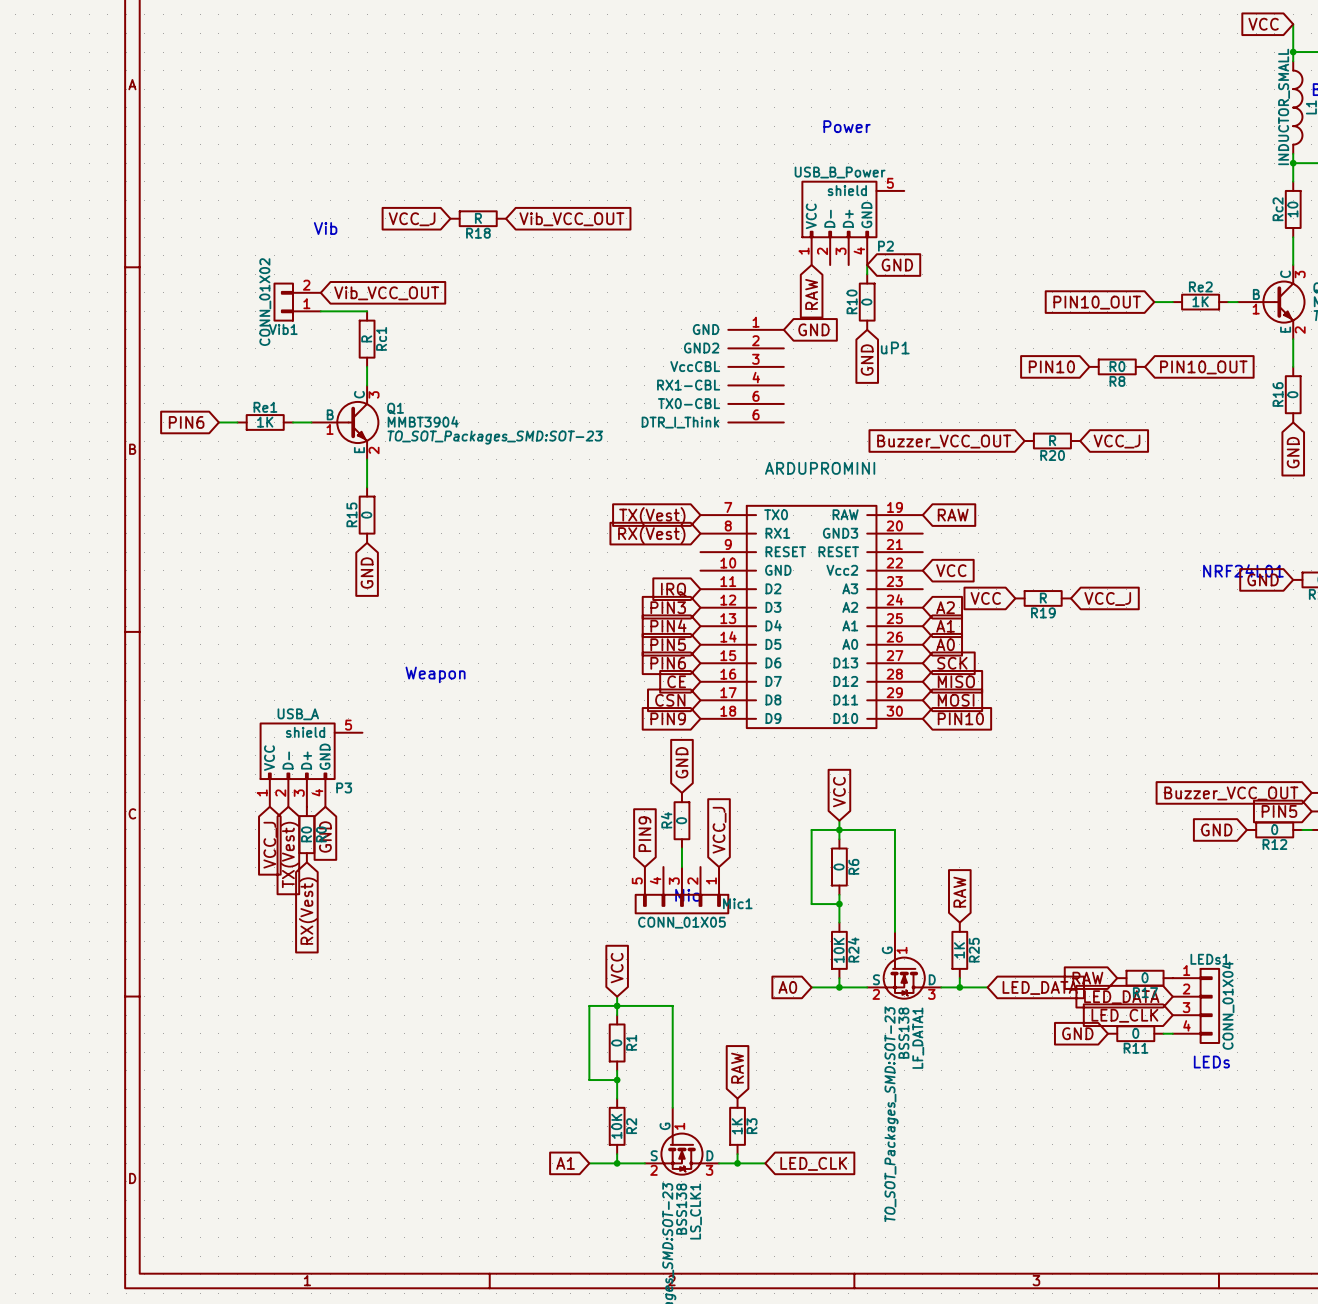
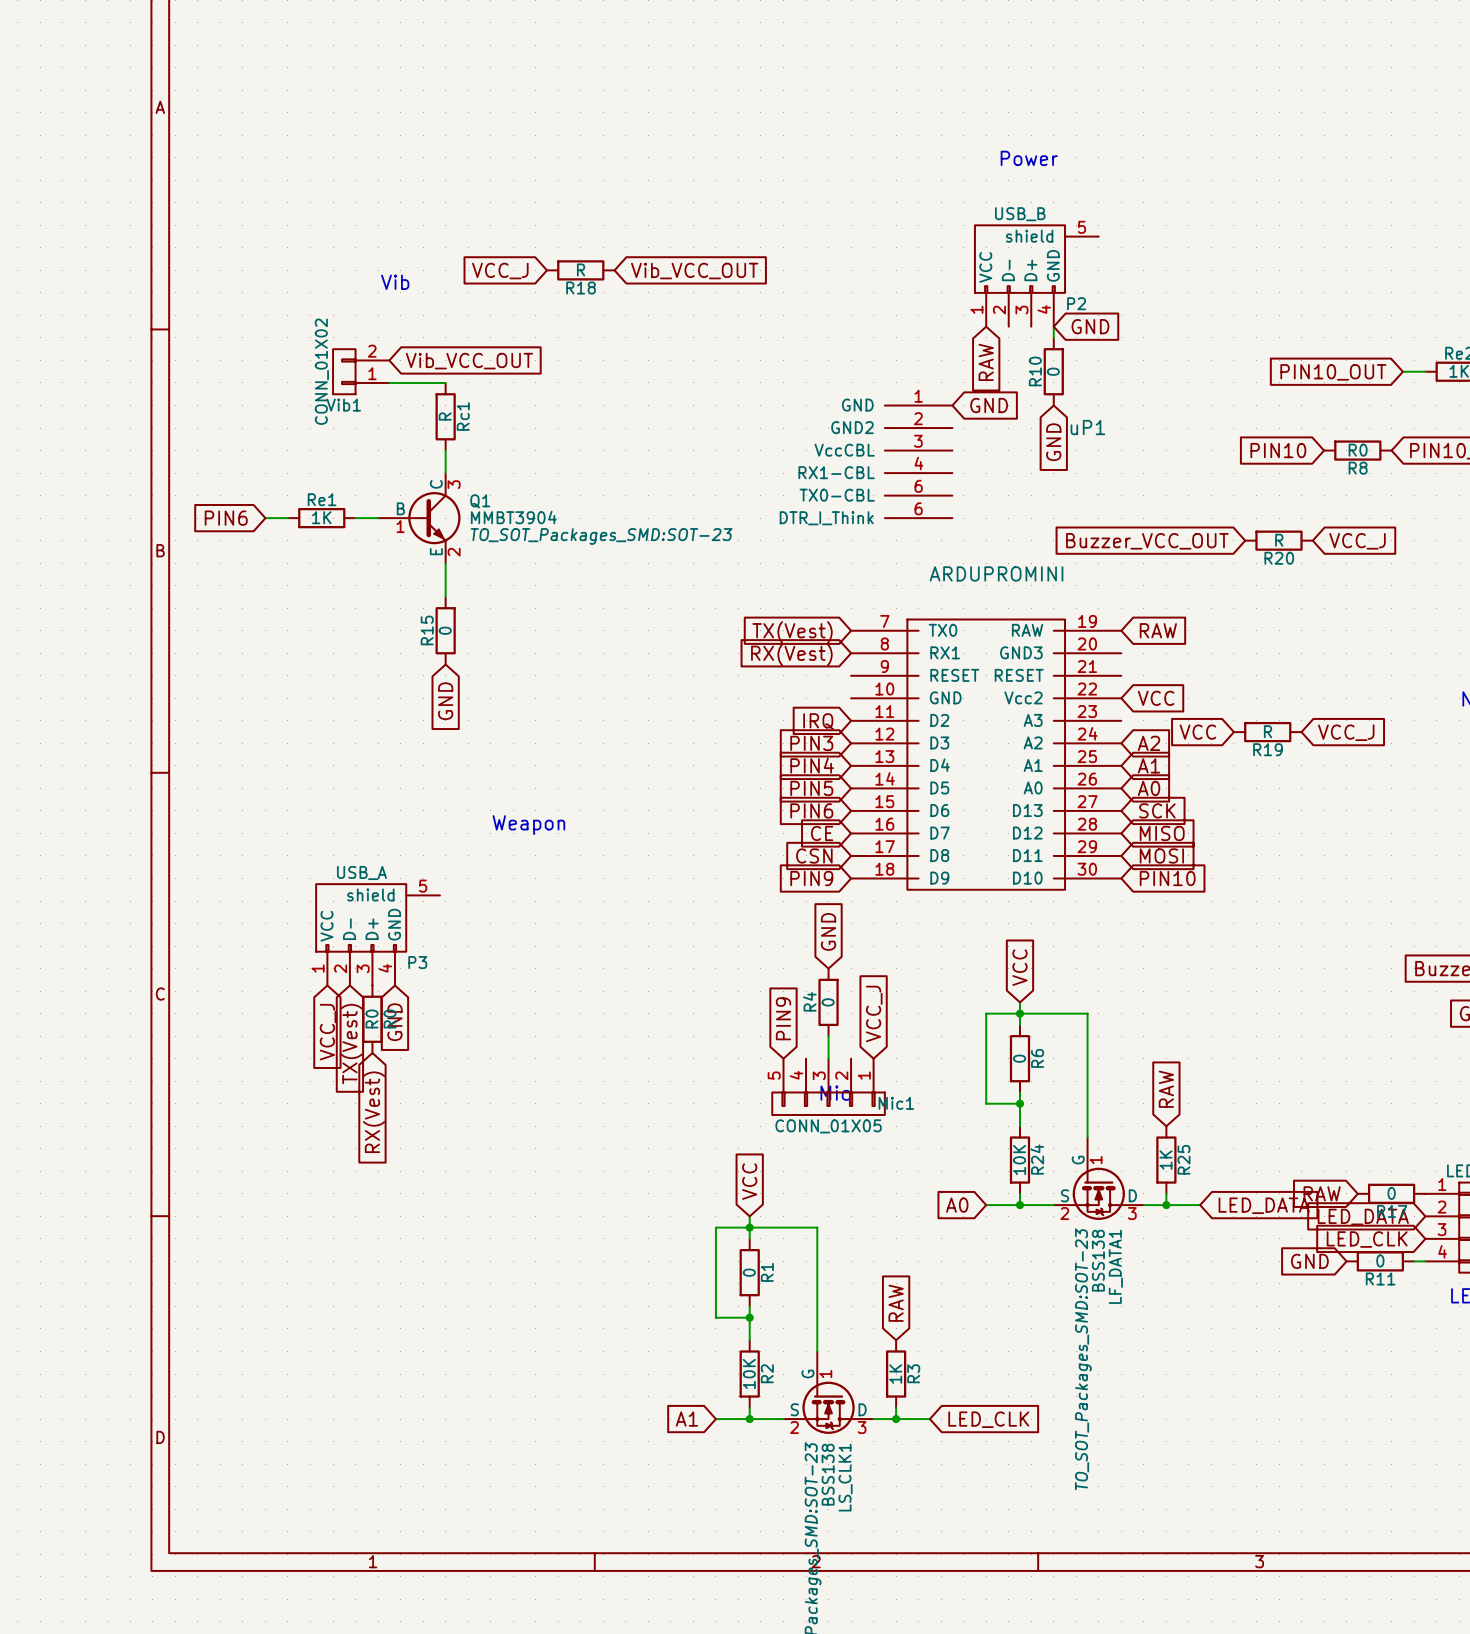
P2 value: USB_B_Power (840, 172) -> USB_B (1020, 214)

